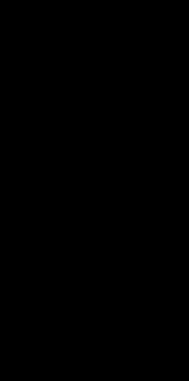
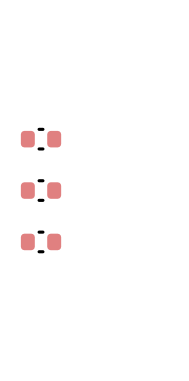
part: none -> (41, 139)
part: none -> (41, 190)
part: none -> (41, 241)

